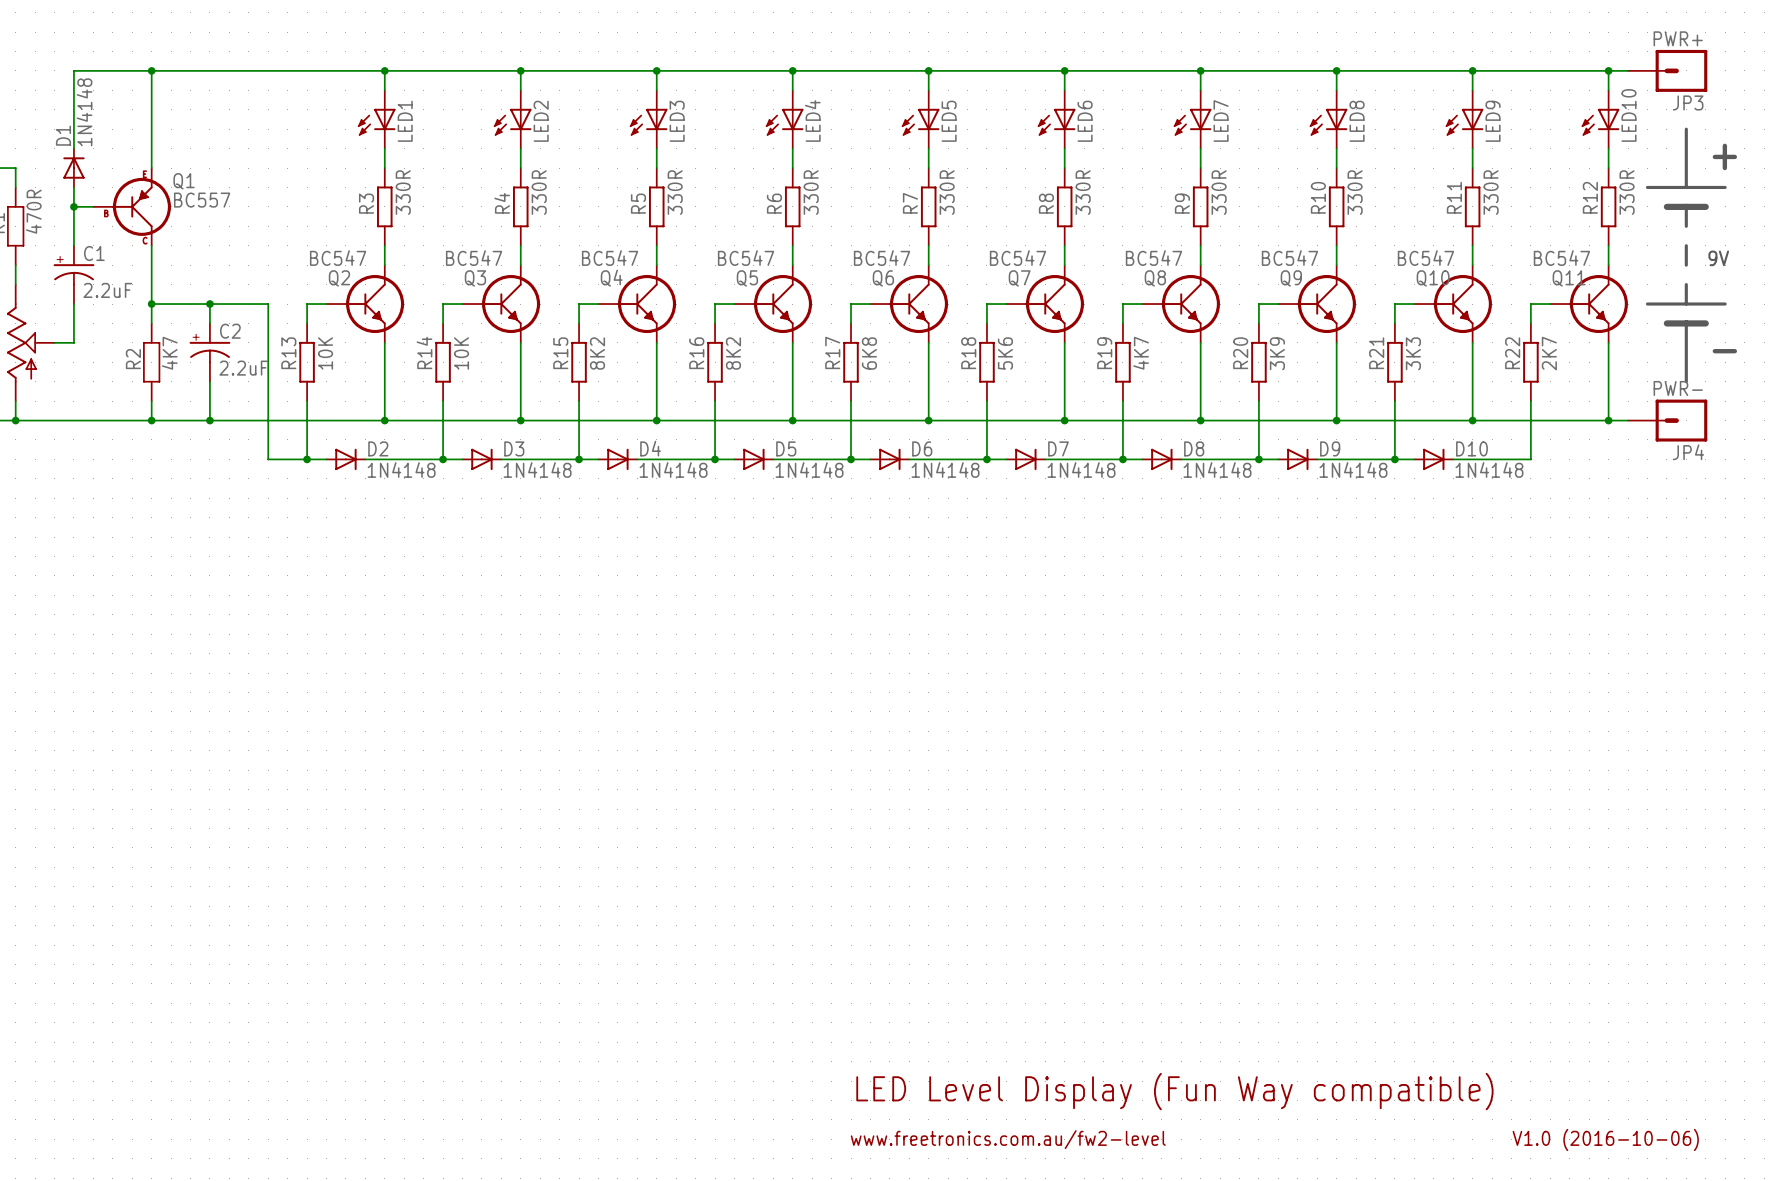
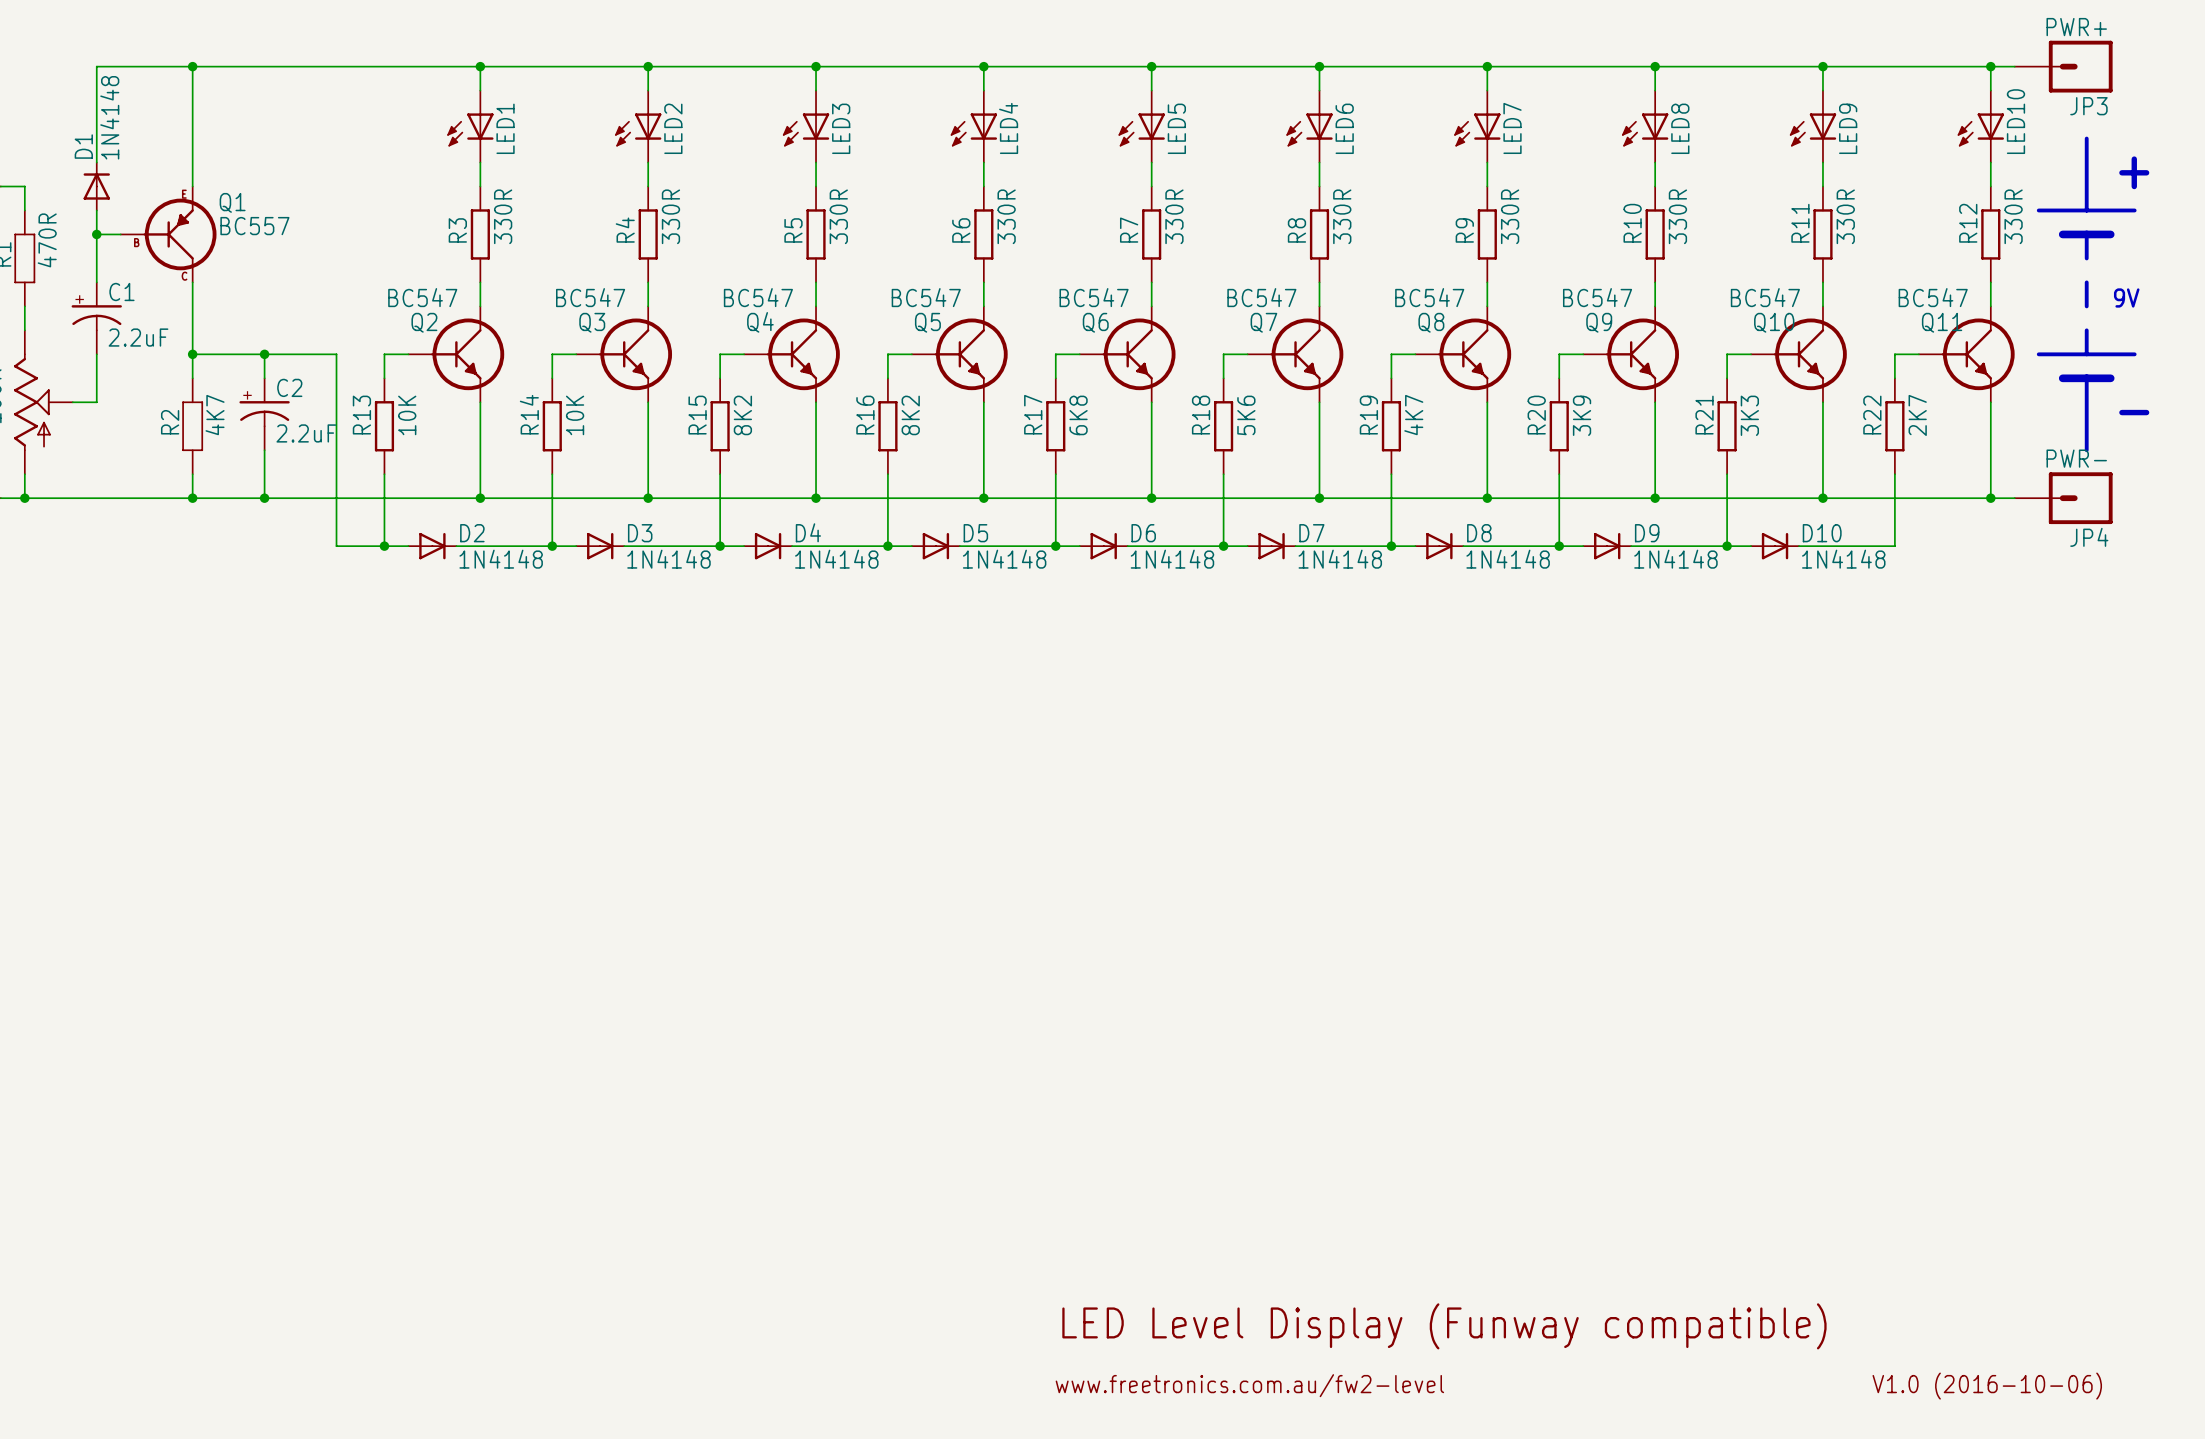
text: LED Level Display (Fun Way compatible) (1174, 1091) -> LED Level Display (Funway compatible) (1444, 1326)

